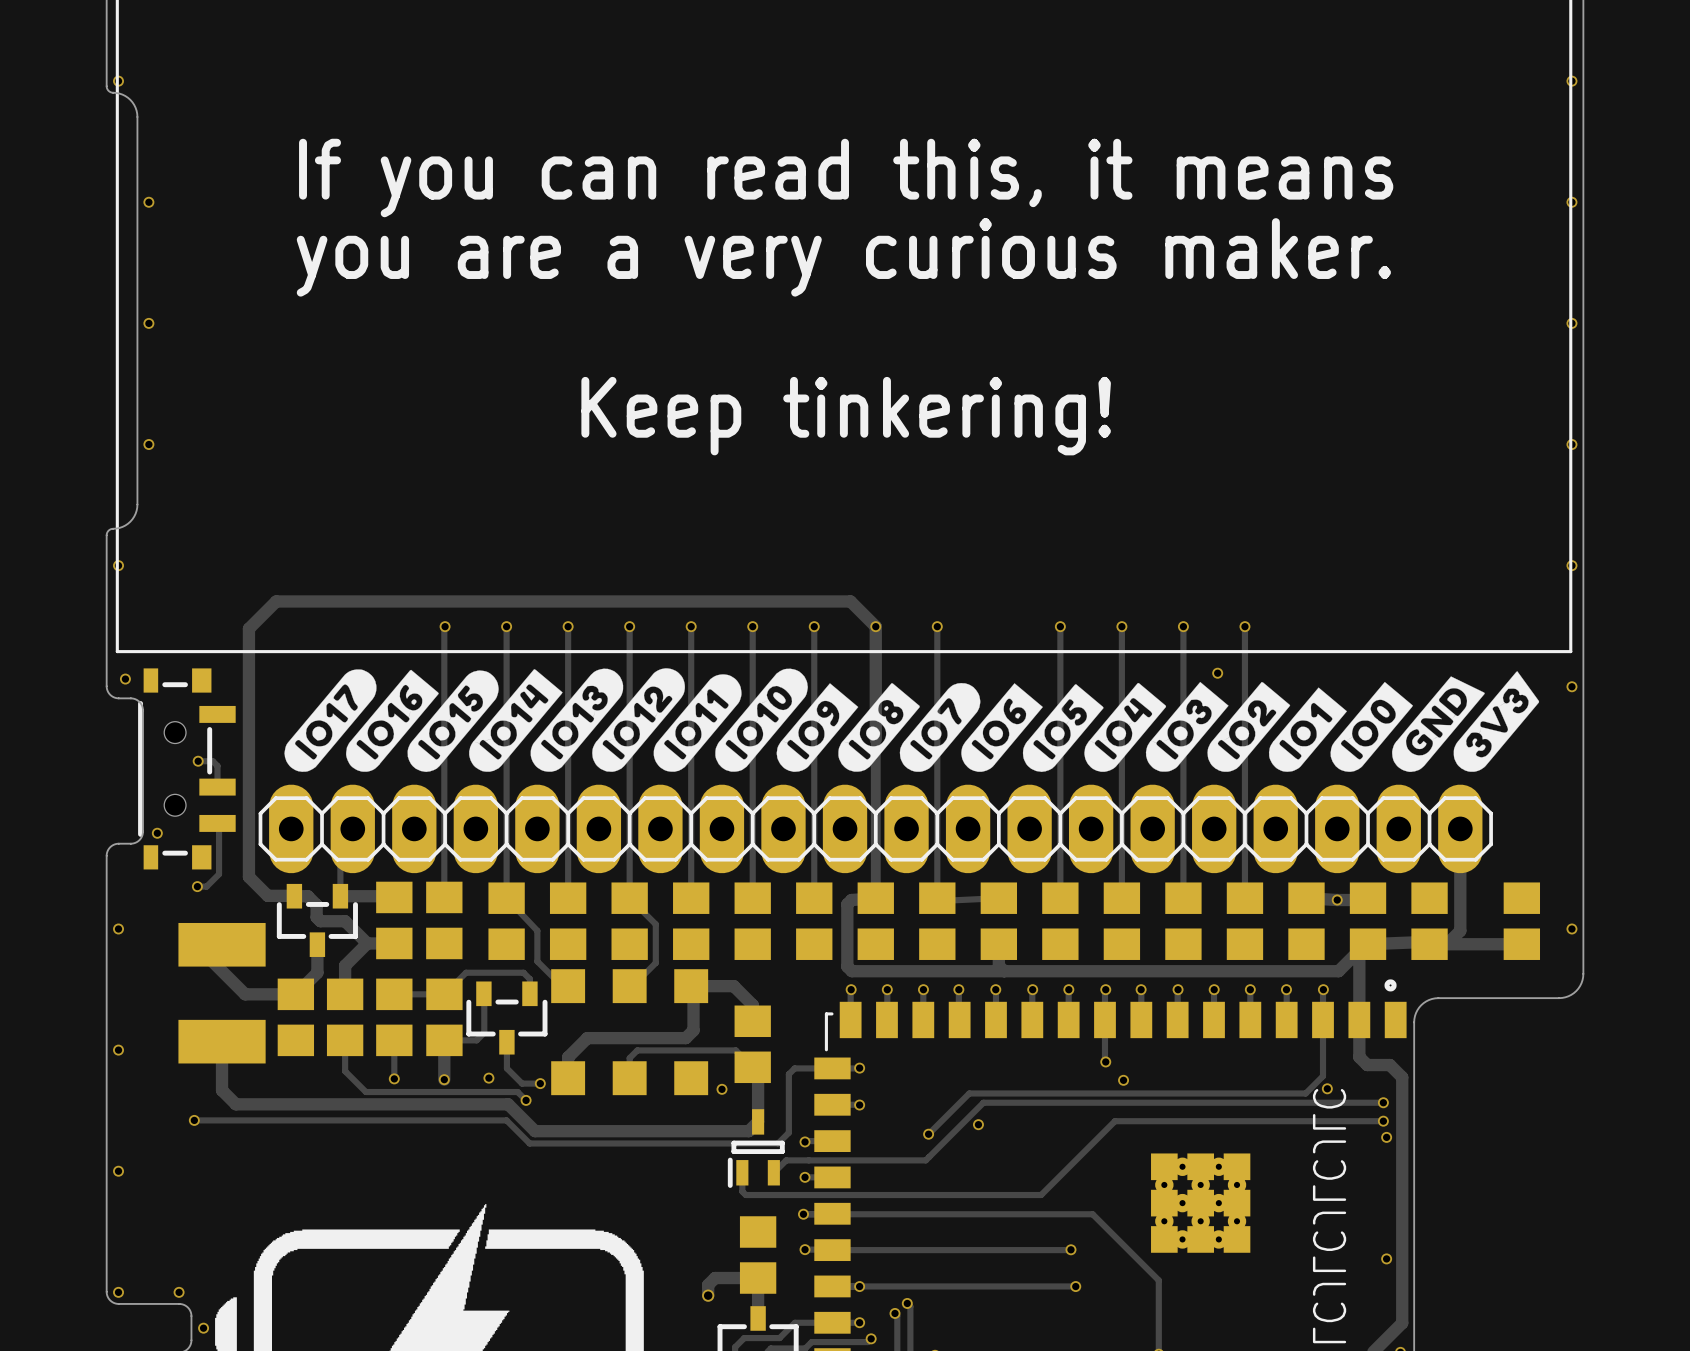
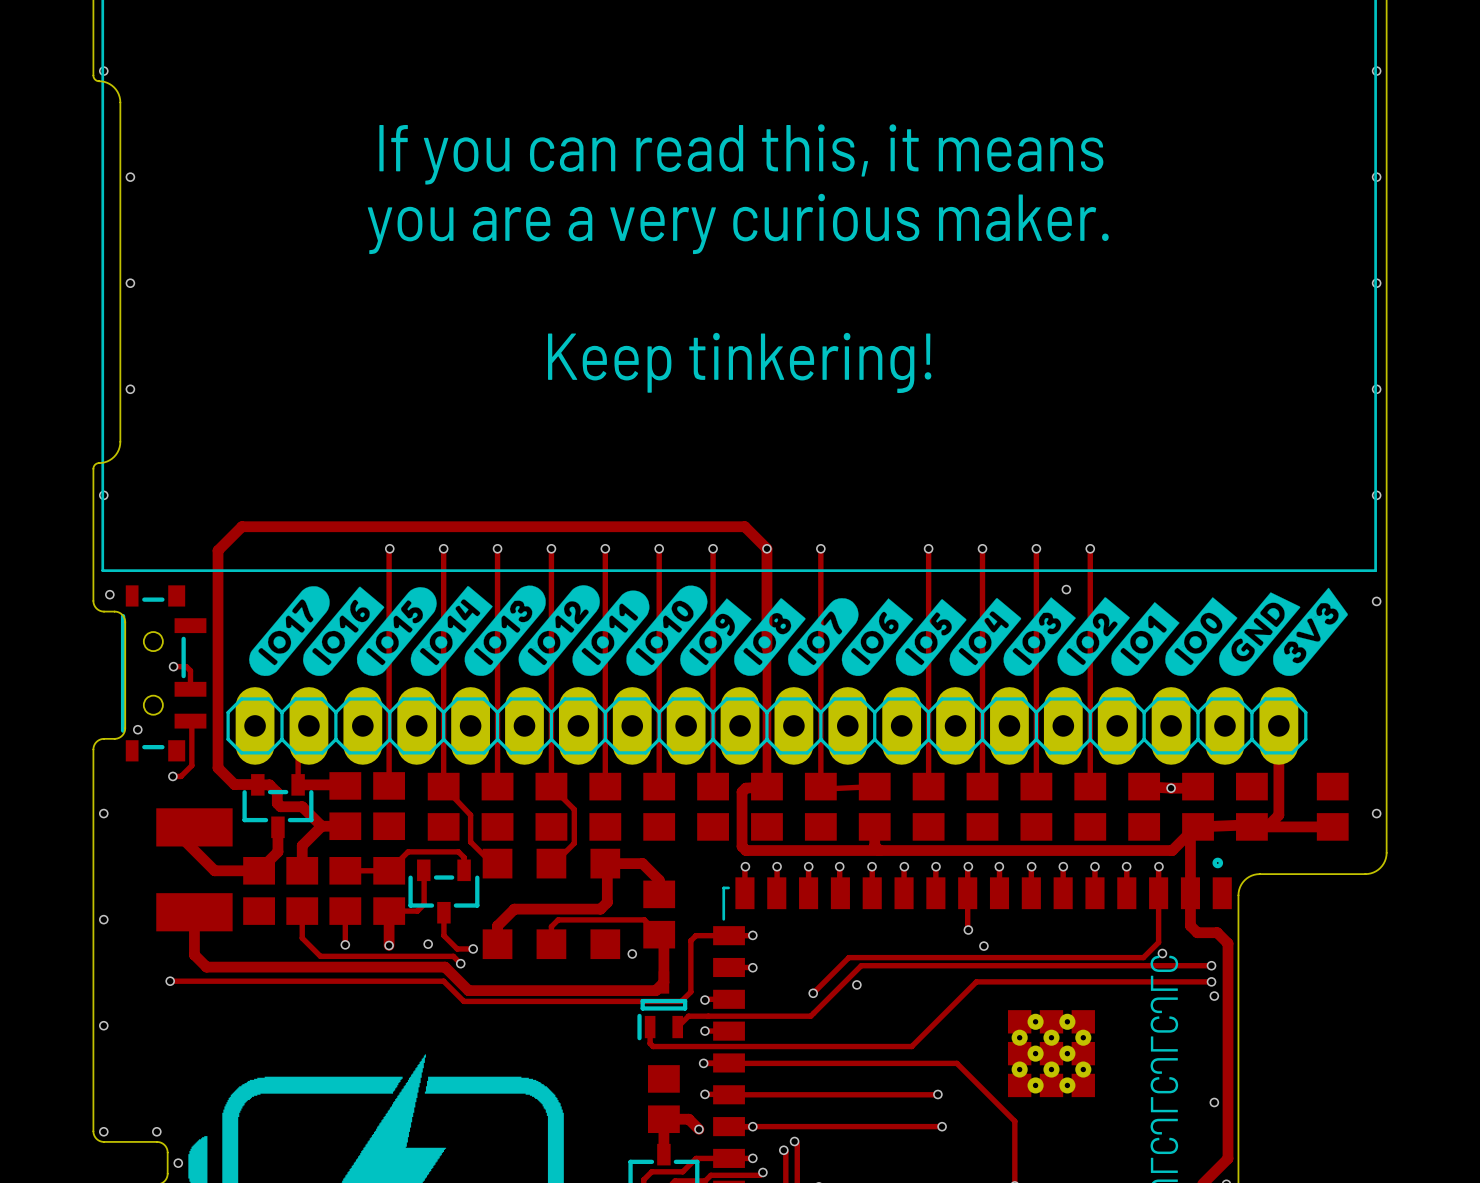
track: (758, 1278) (715, 1278) (708, 1284) (708, 1295) -> (663, 1119) (688, 1119) (698, 1129)
via: none -> (698, 1129)
via: (708, 1295) -> none

